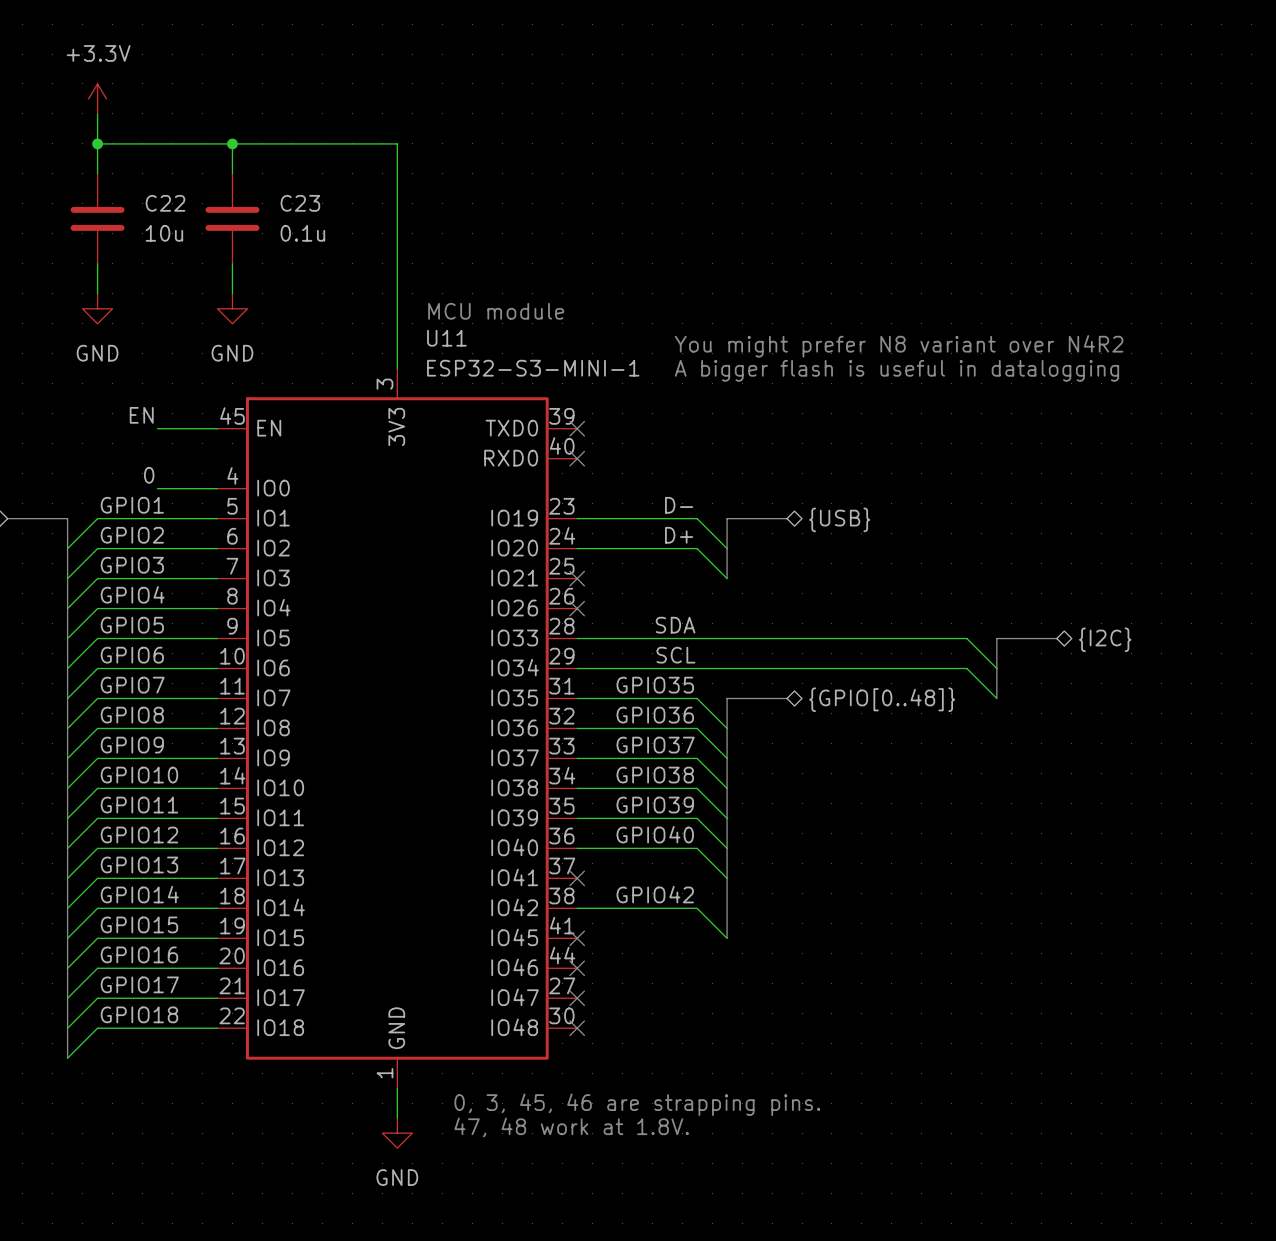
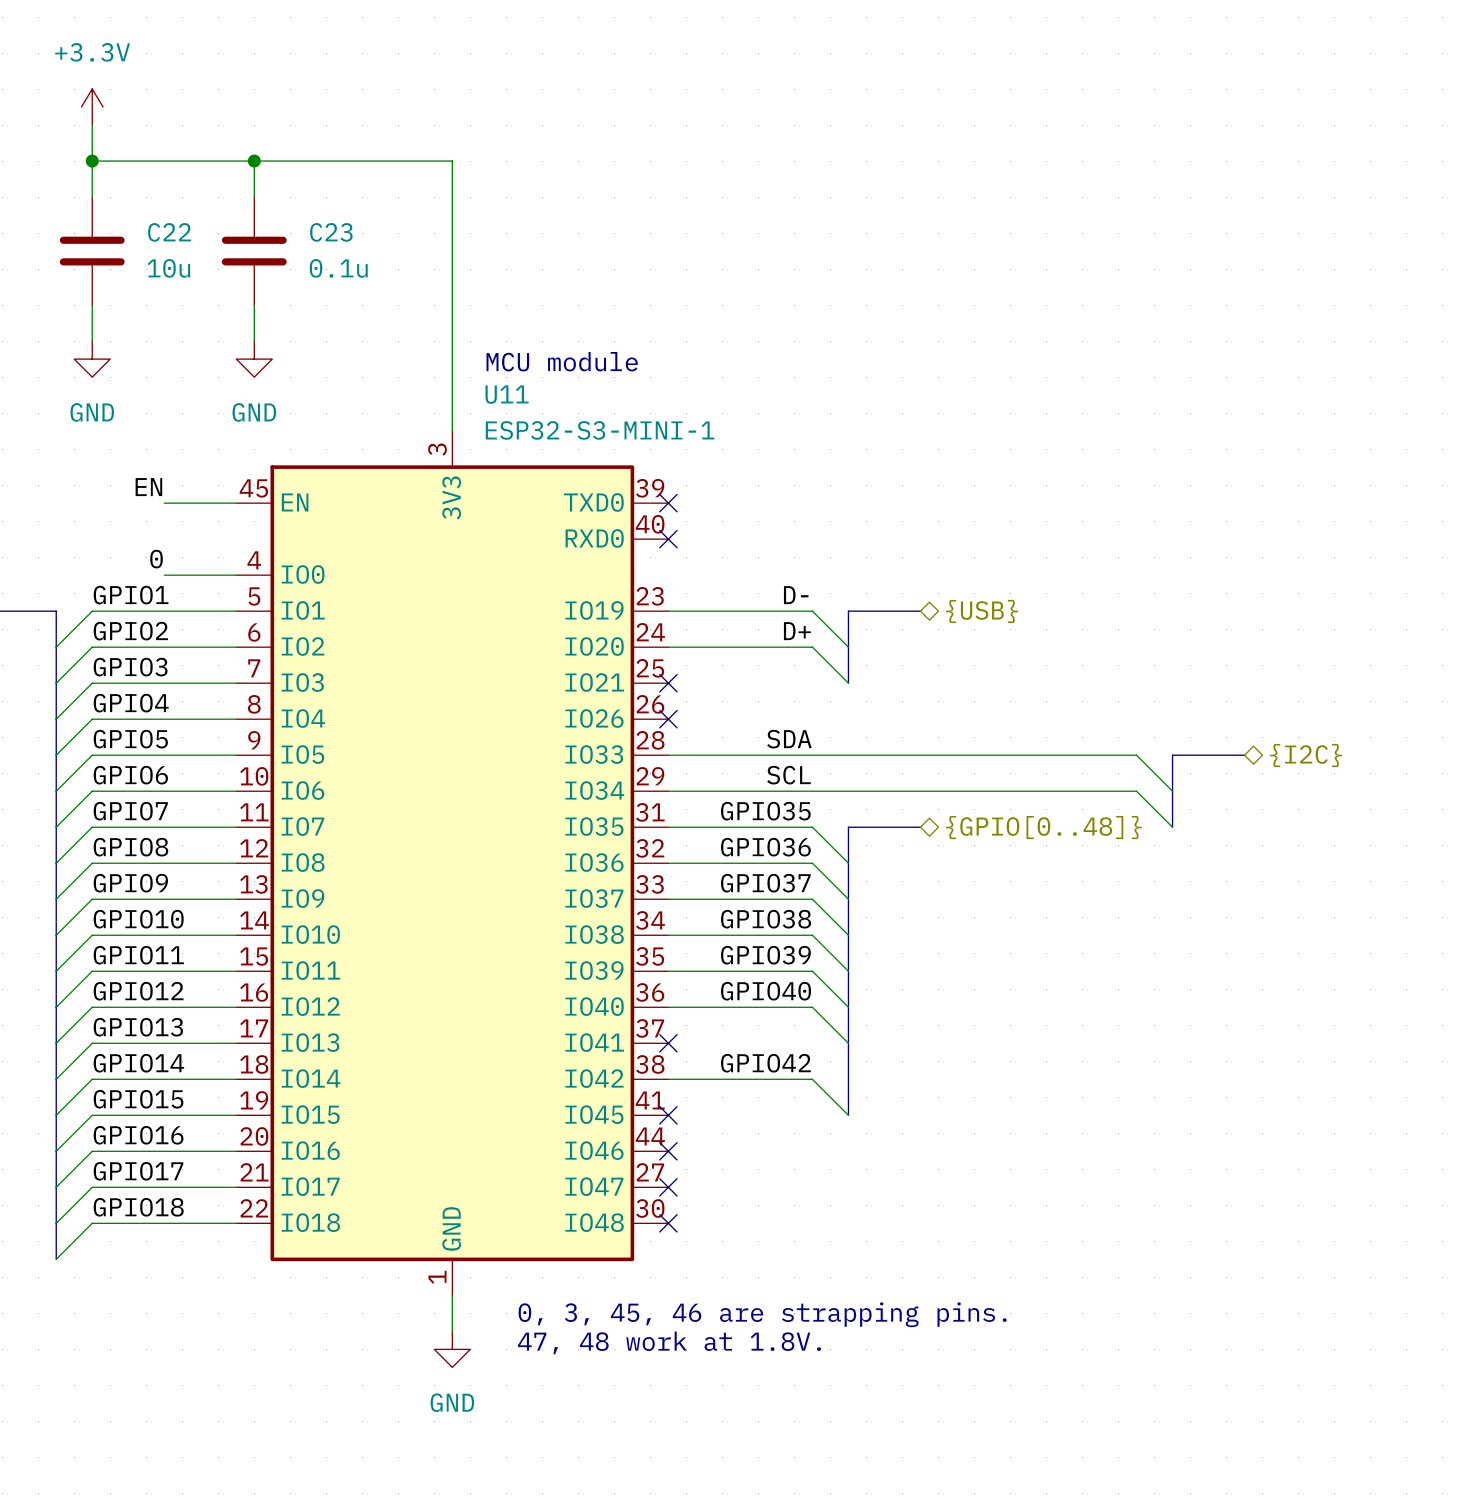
text: You might prefer N8 variant over N4R2 (899, 346) -> none
text: A bigger flash is useful in datalogging (896, 370) -> none

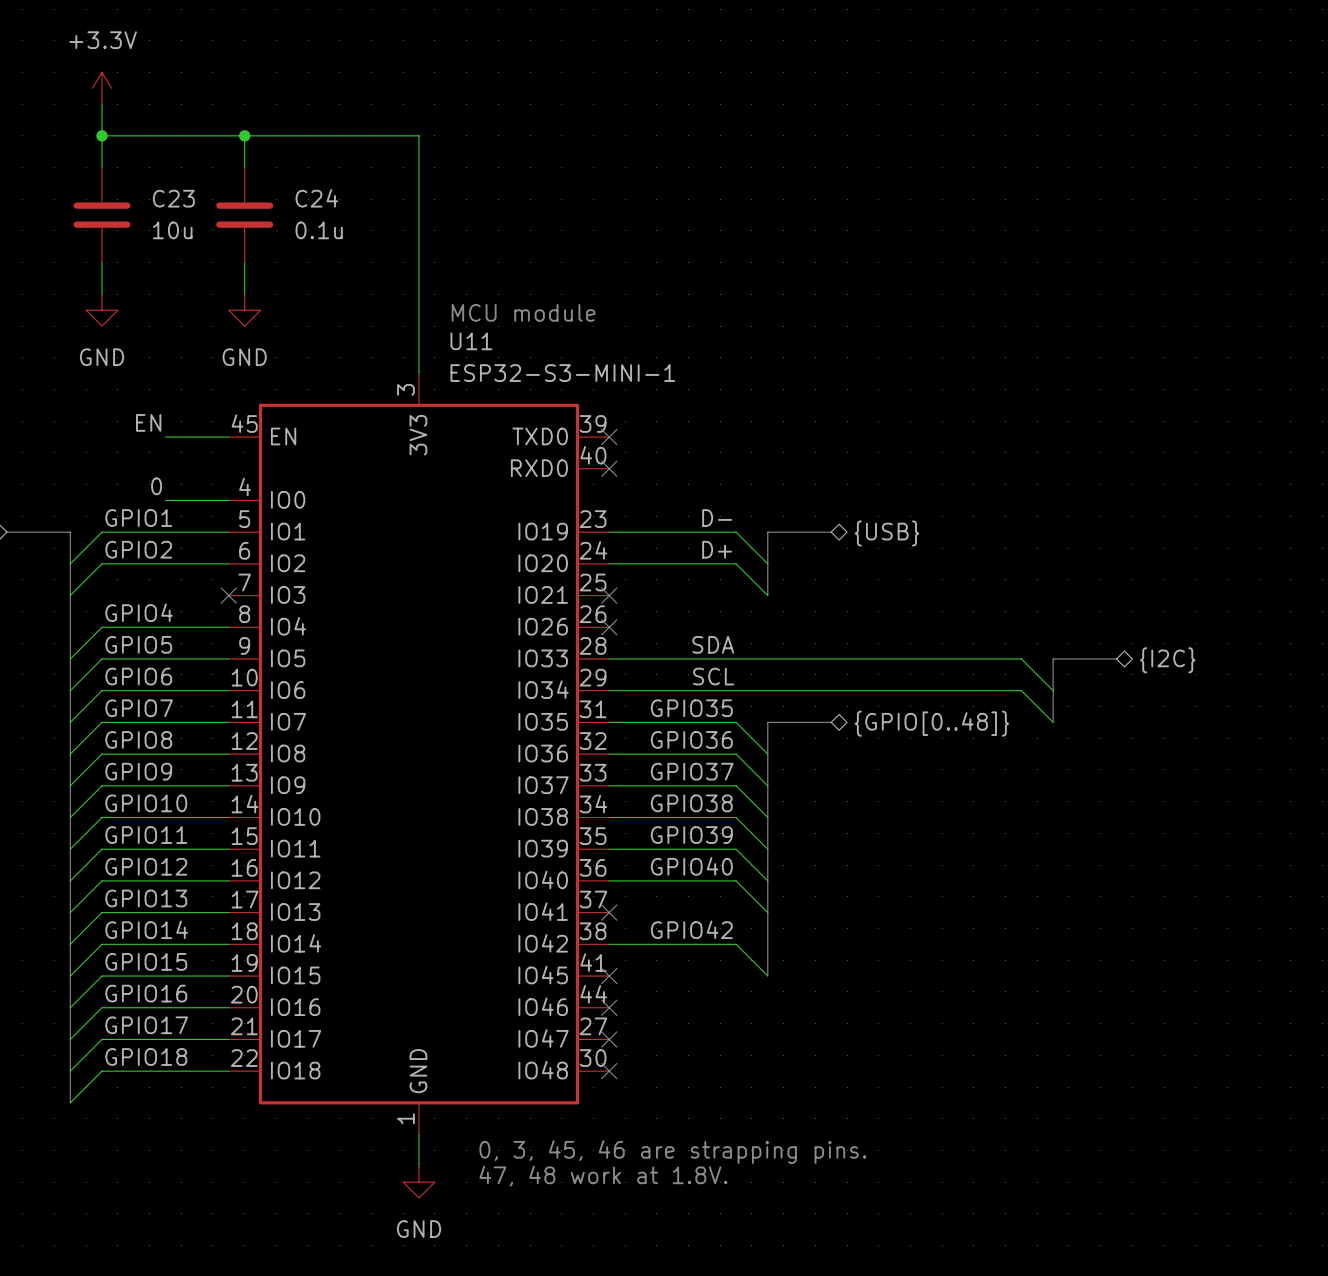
C22 name: C22 (169, 232) -> C23 (173, 198)
C23 name: C23 (331, 232) -> C24 (316, 198)
label: GPIO3 (130, 667) -> none
wire: (236, 683) (92, 683) (56, 719) -> none
no-connect mark: none -> (228, 595)

